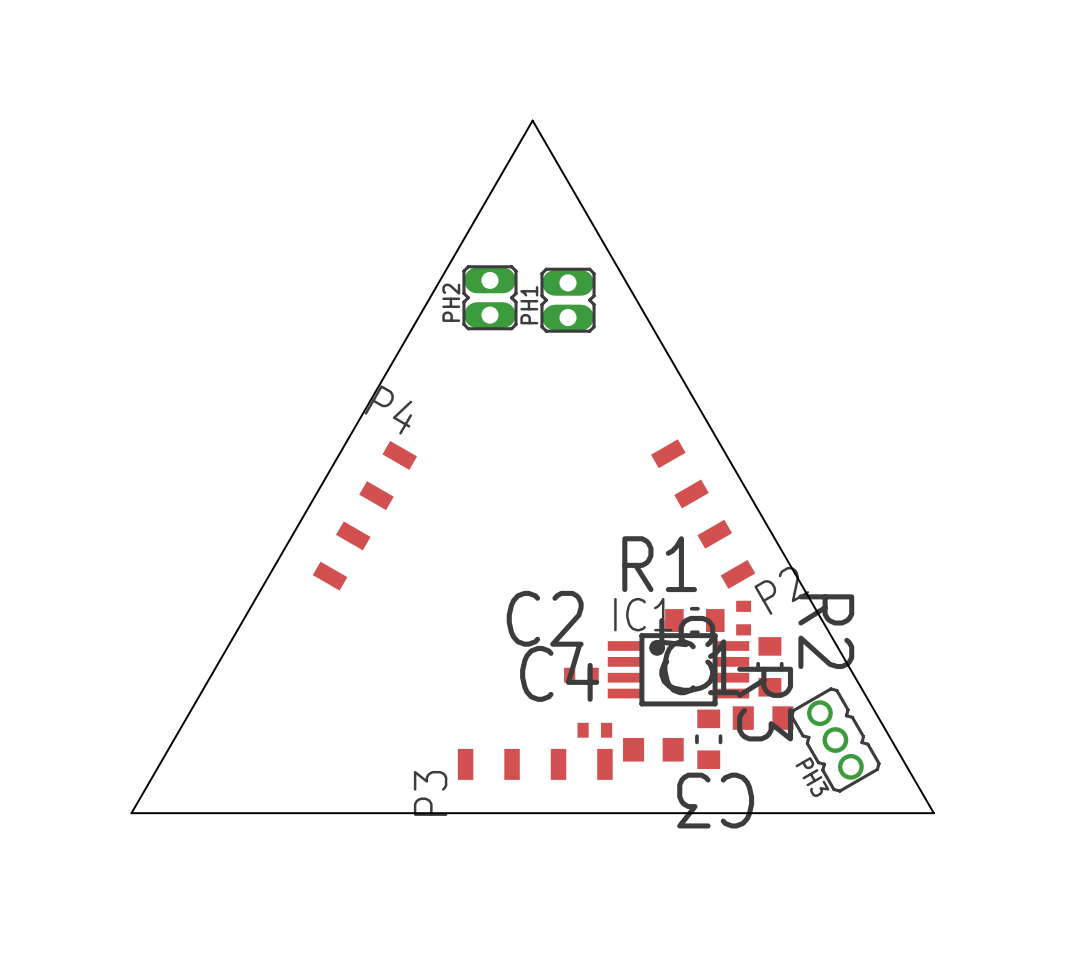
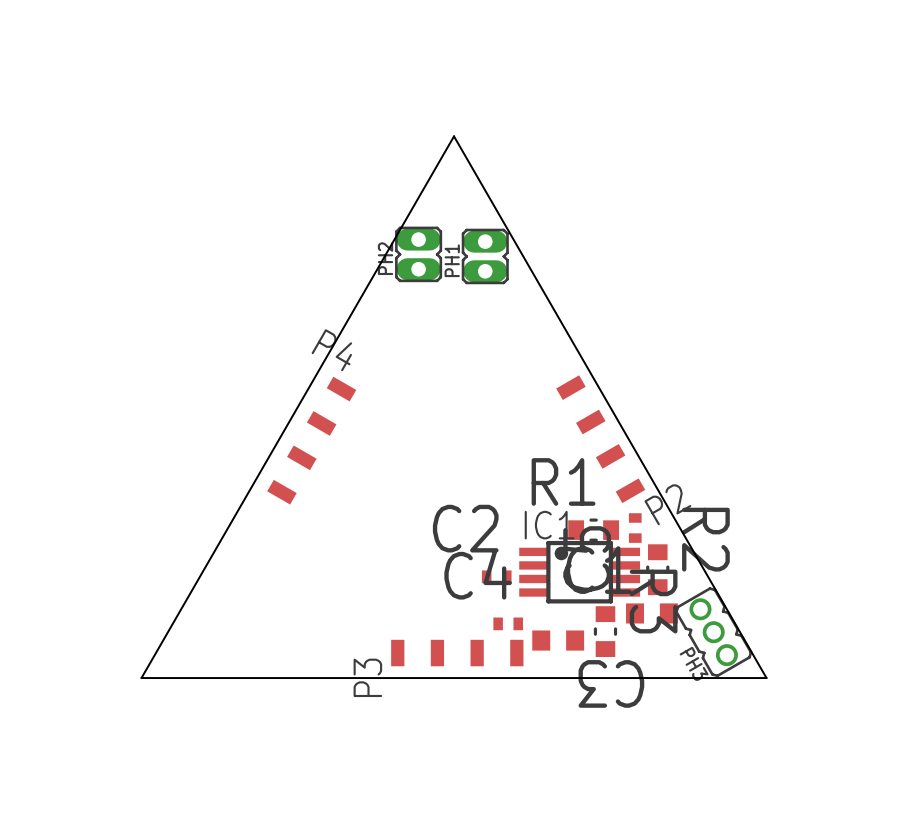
board edge: (532, 120) (131, 813) (933, 813) (532, 120) -> (454, 136) (141, 678) (766, 678) (454, 136)

